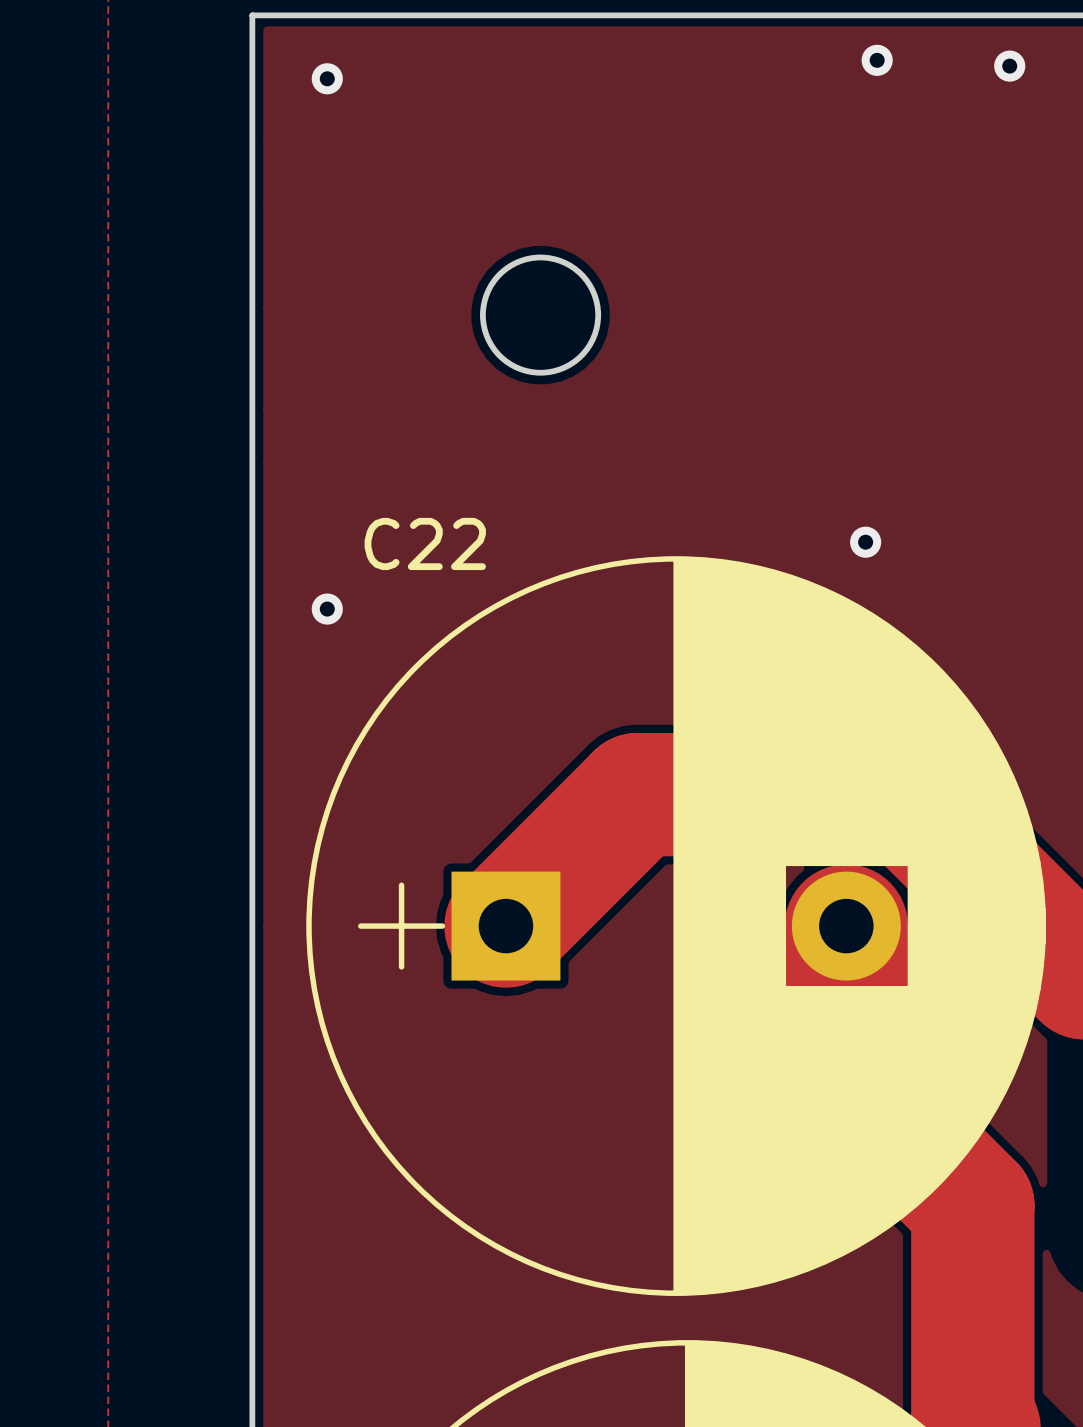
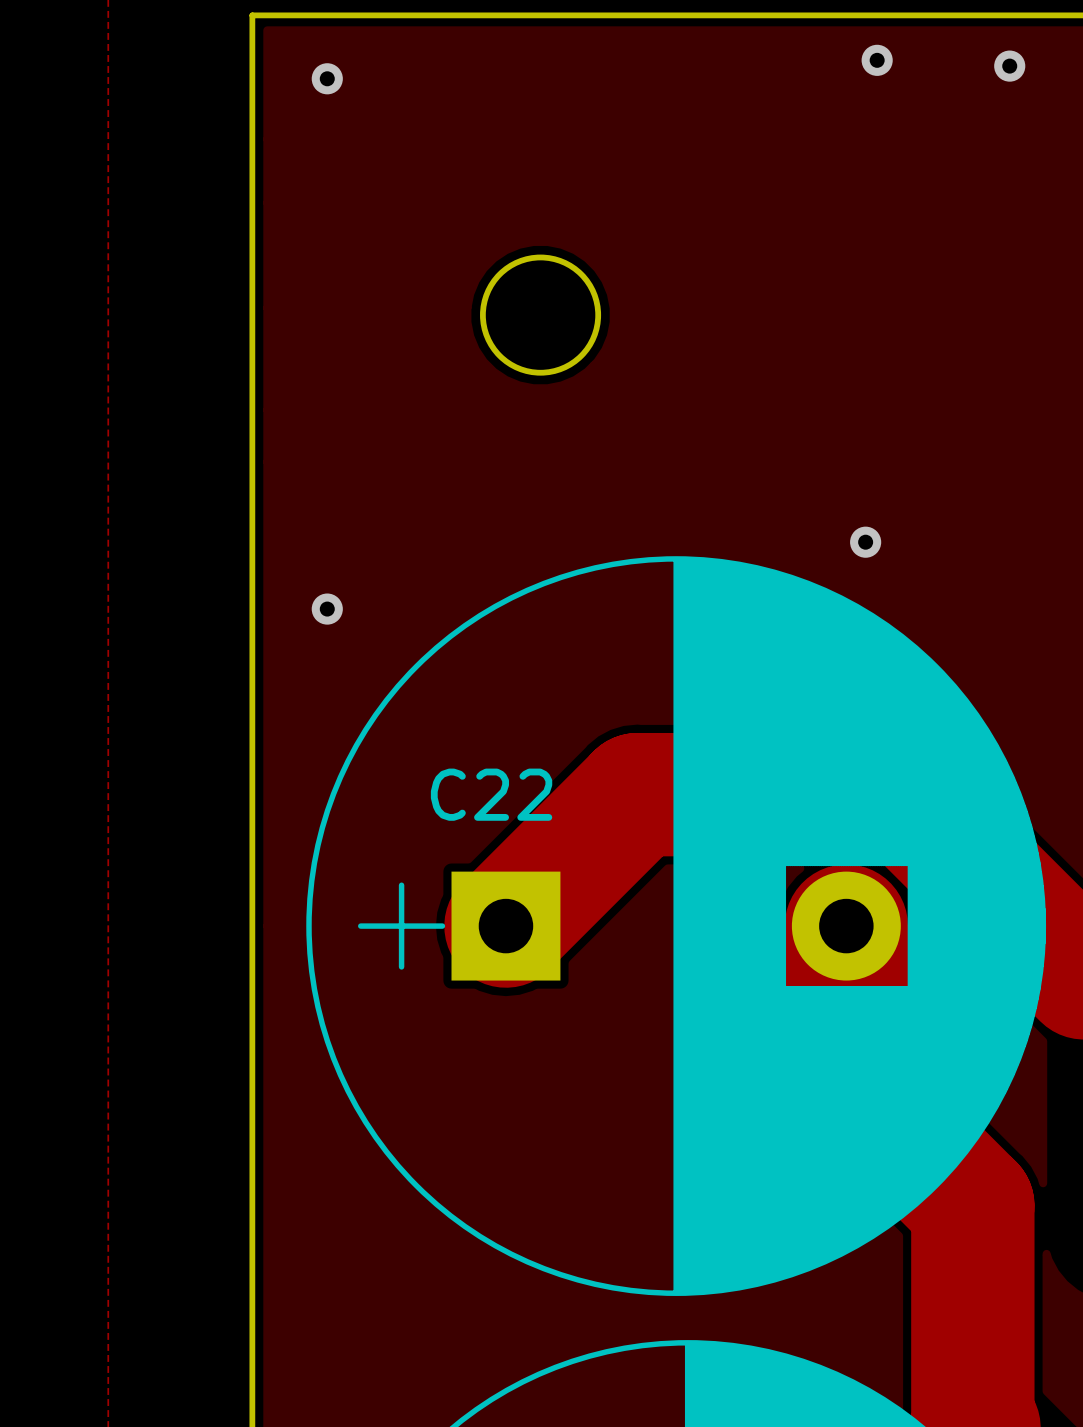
C22 name position: C22 (425, 543) -> C22 (491, 794)

